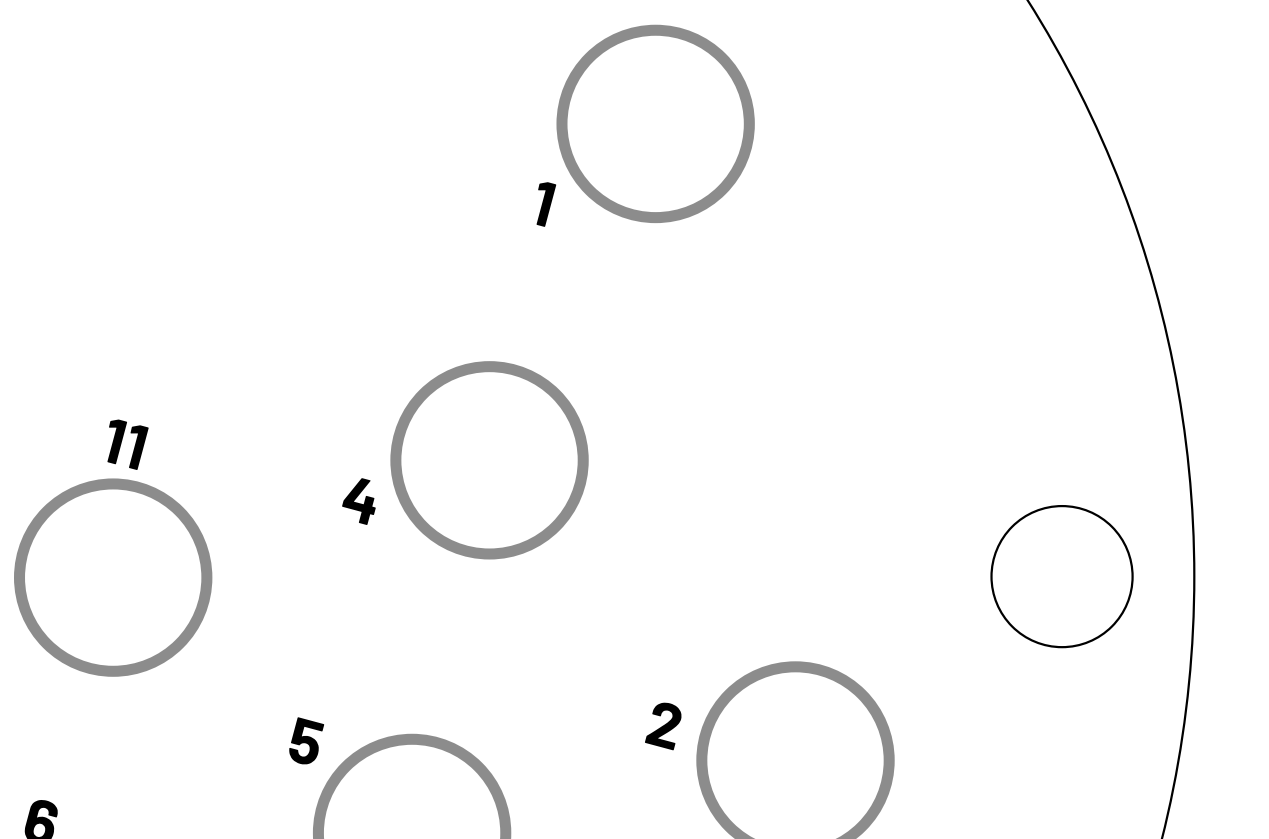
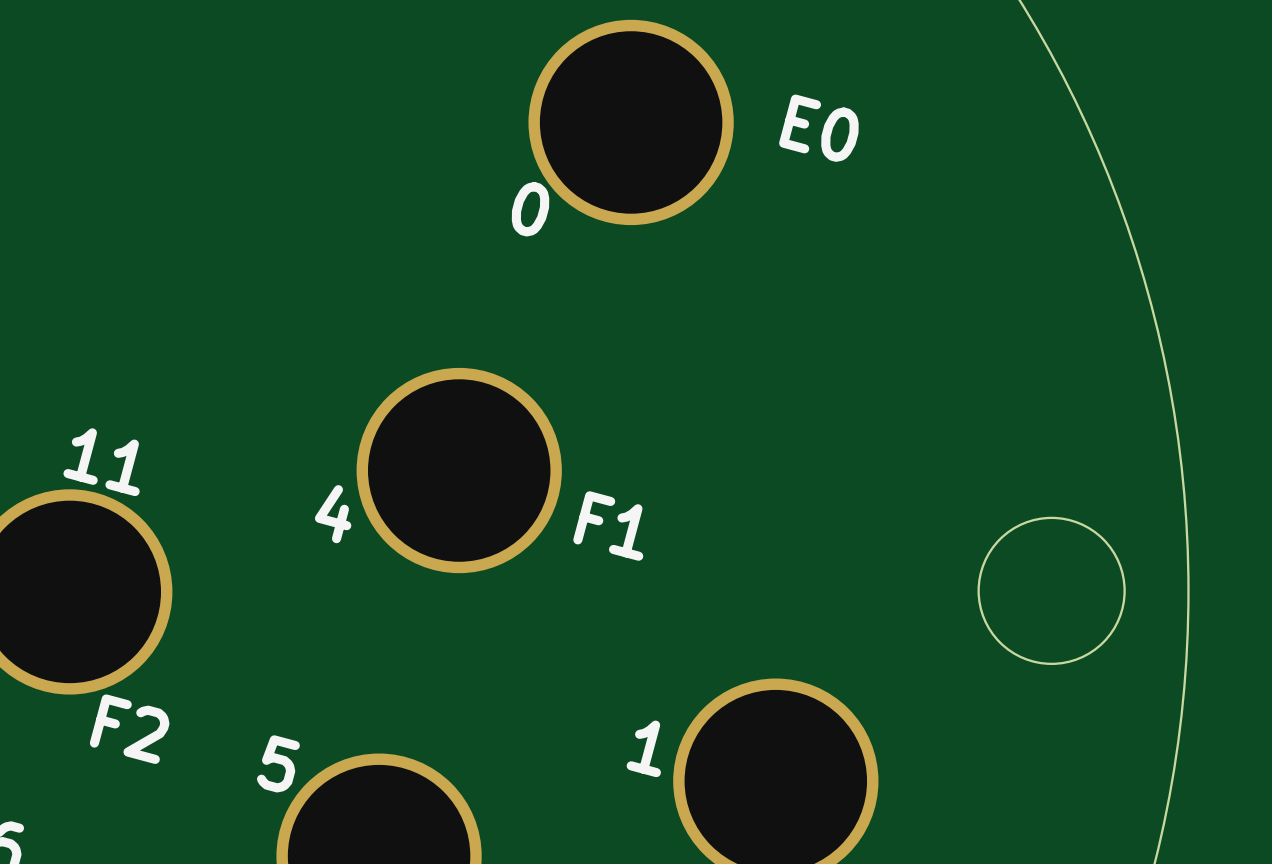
text: none -> E0 (818, 128)
text: 1 (546, 204) -> 0 (530, 209)
text: none -> F1 (608, 526)
text: none -> F2 (129, 729)
text: 2 (663, 726) -> 1 (643, 748)

